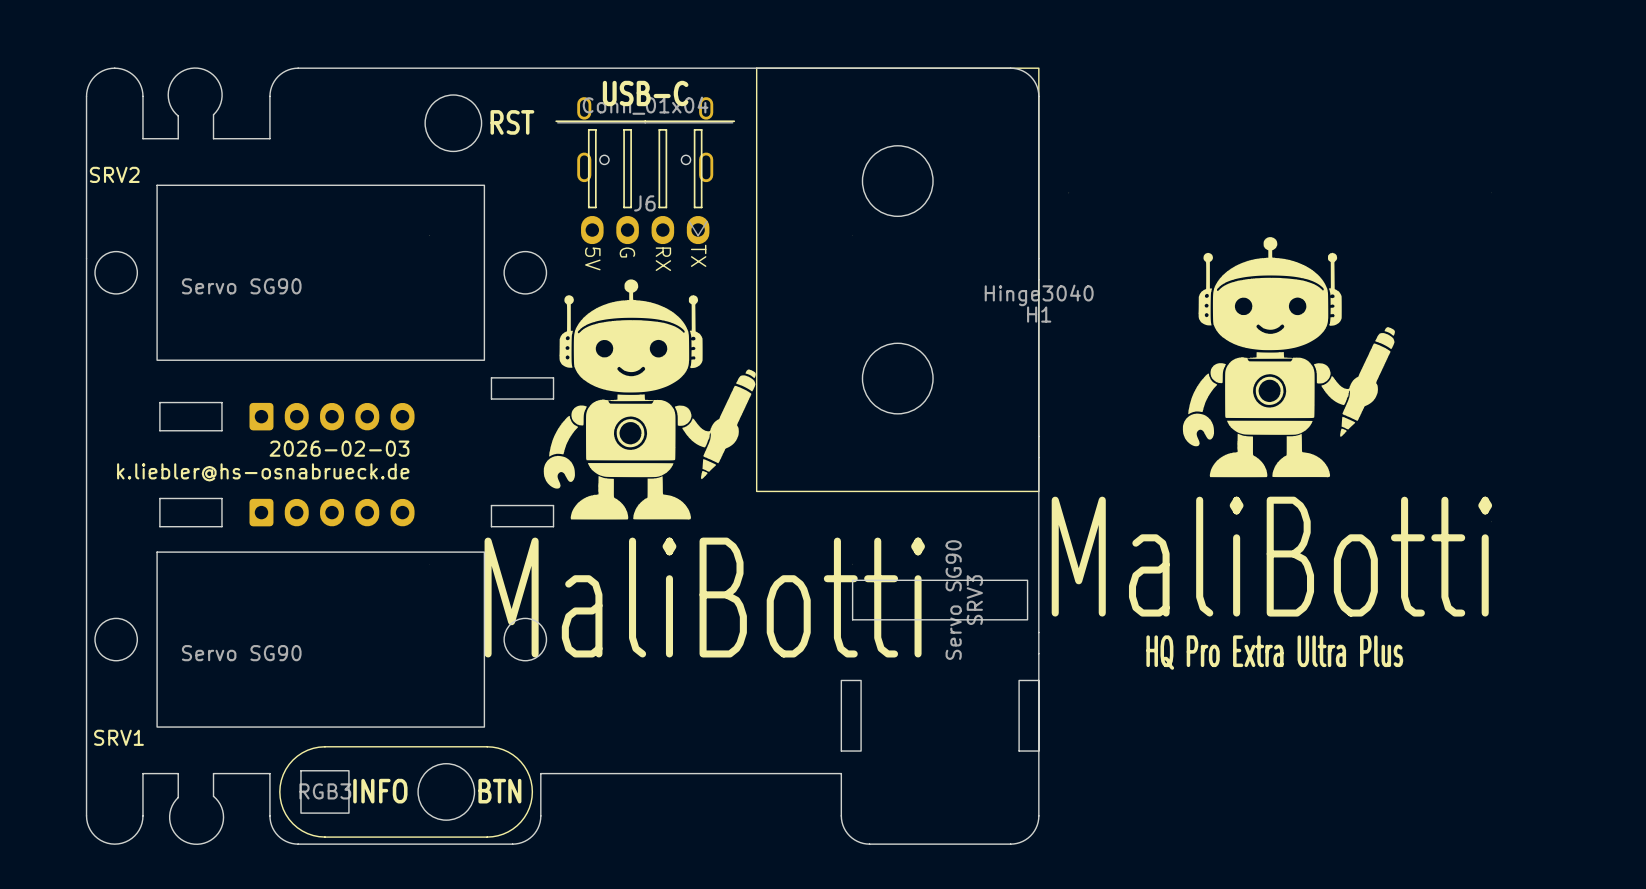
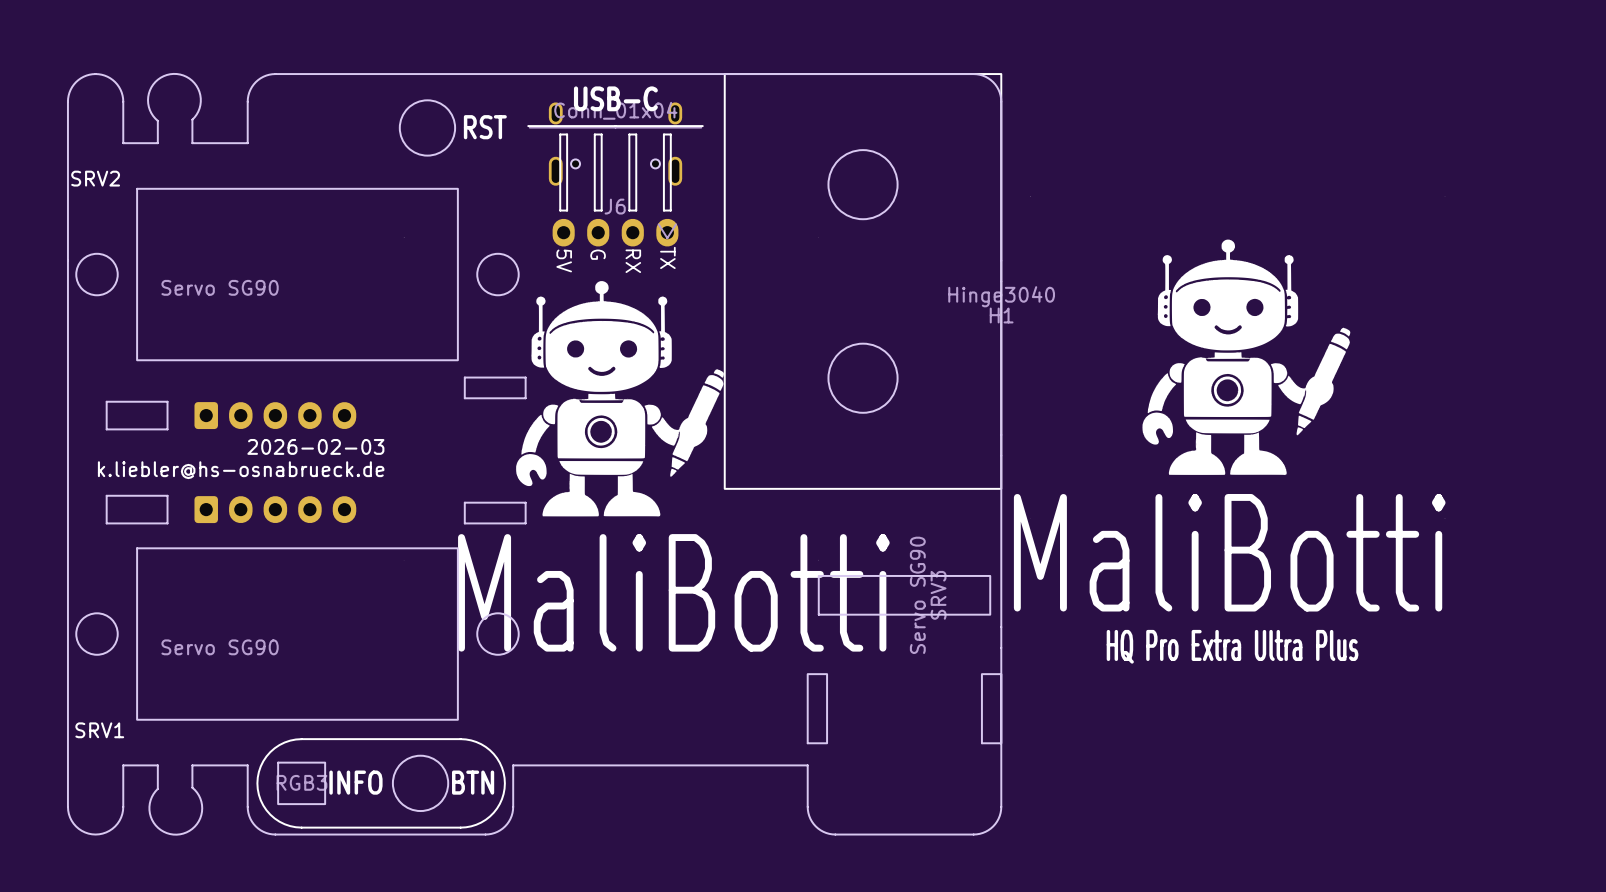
board edge: (159, 402) (159, 430) -> (139, 401) (106, 401) (106, 429) (139, 429)
board edge: (188, 402) (221, 402) (221, 430) (188, 430) -> (167, 401) (167, 429)
part position: (332, 416) -> (275, 415)
board edge: (159, 498) (159, 526) -> (139, 495) (106, 495) (106, 523) (139, 523)
board edge: (188, 498) (221, 498) (221, 526) (188, 526) -> (167, 495) (167, 523)
part position: (332, 512) -> (275, 509)

